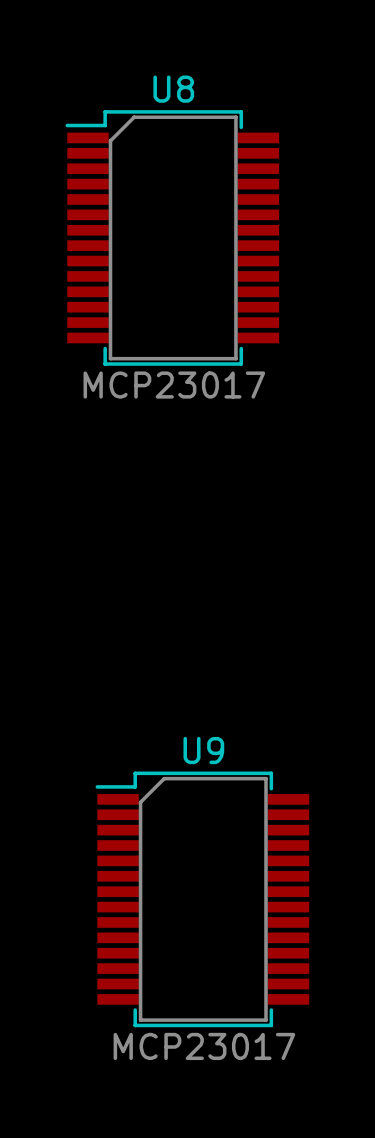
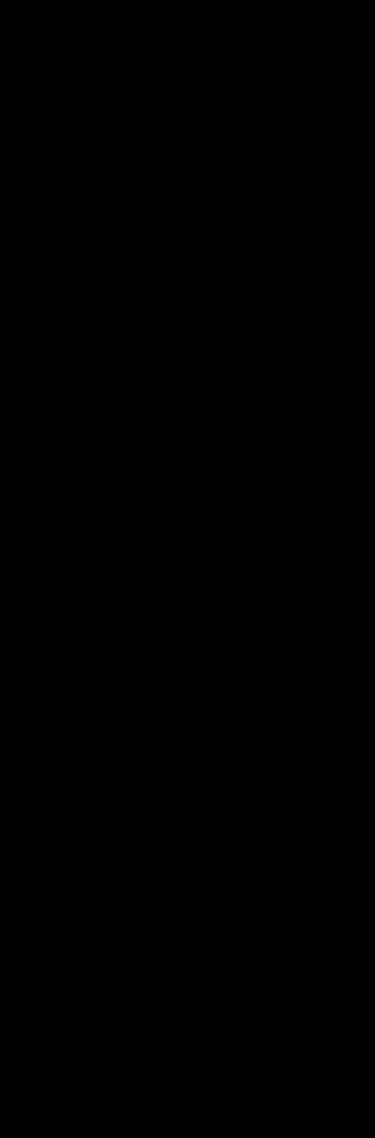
U8: MCP23017 (172, 237) -> none
U9: MCP23017 (202, 899) -> none

